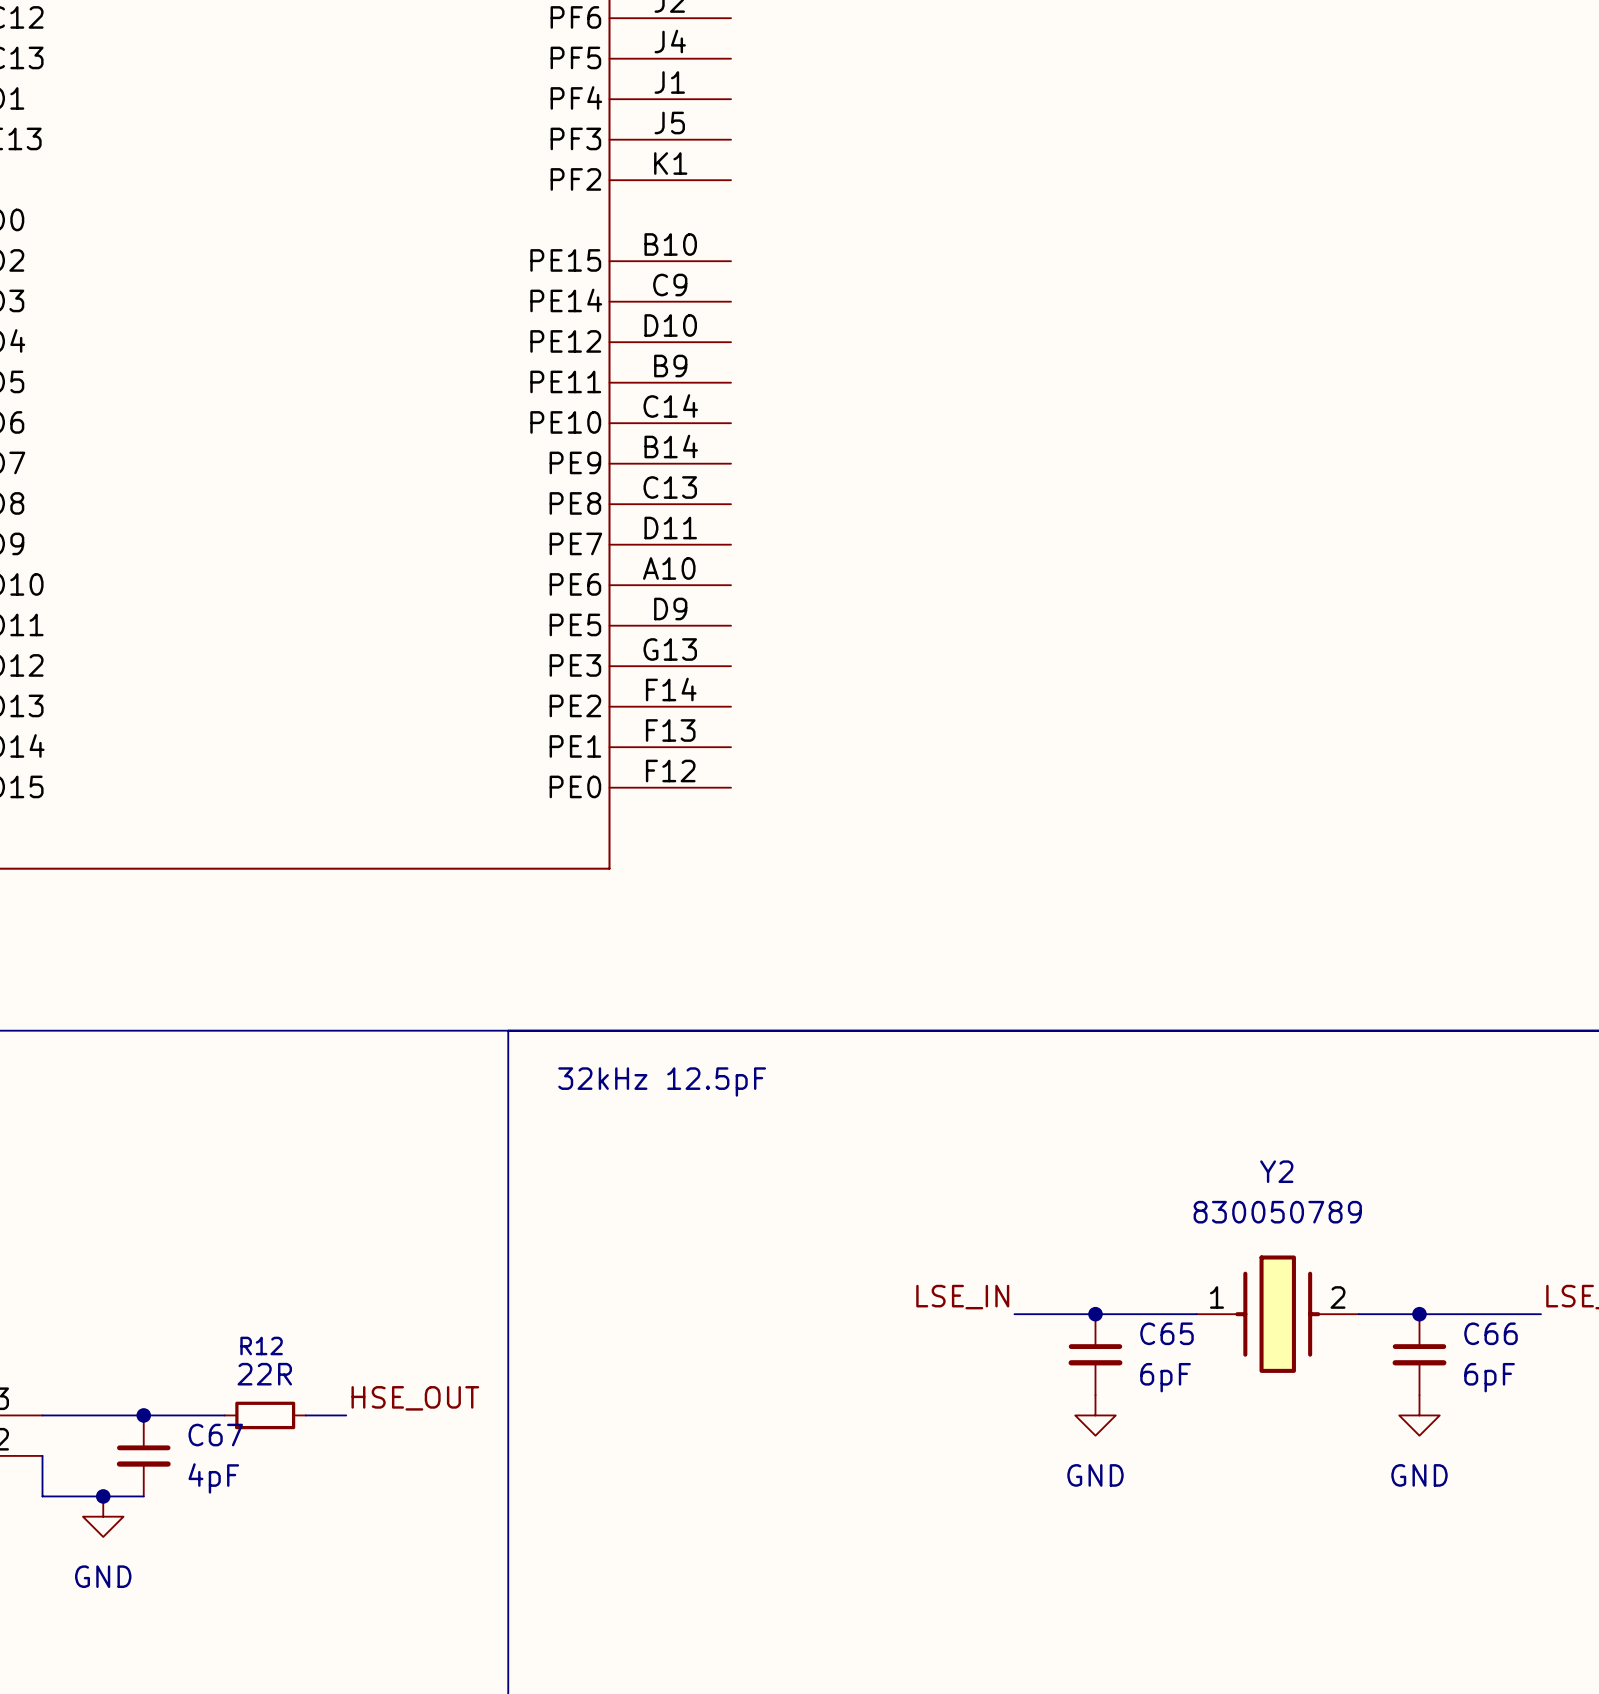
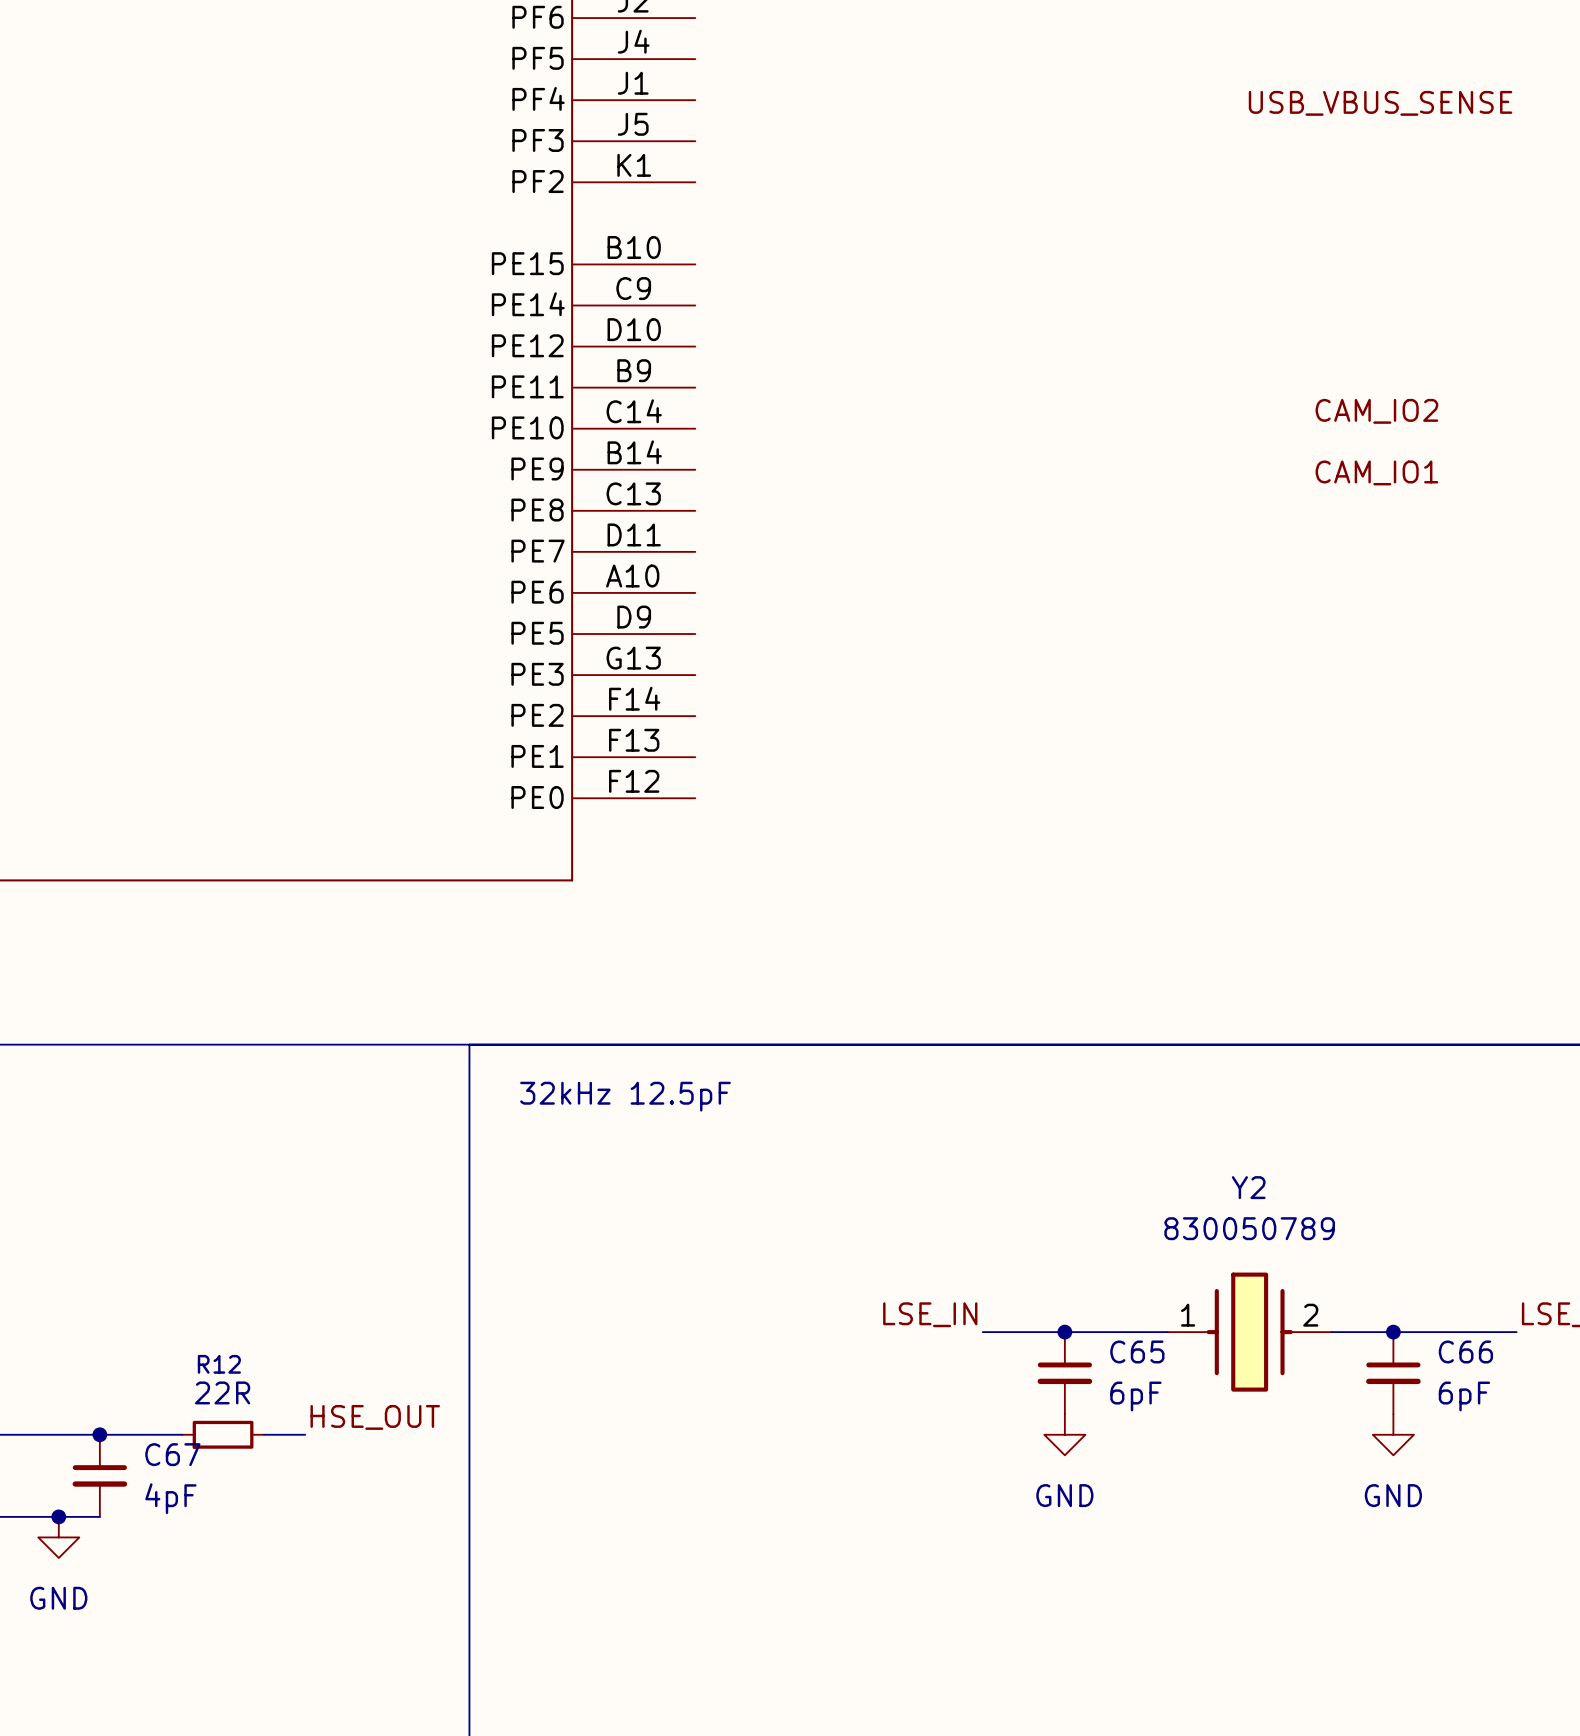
label: none -> USB_VBUS_SENSE (1380, 103)
label: none -> CAM_IO2 (1376, 411)
label: none -> CAM_IO1 (1376, 472)

